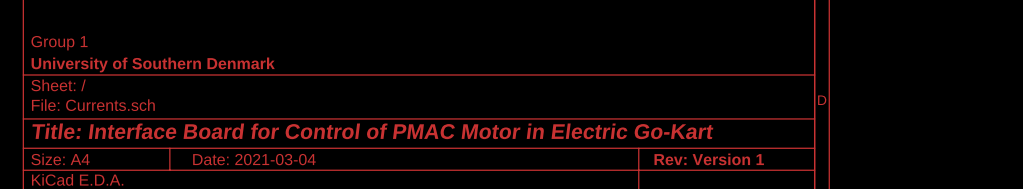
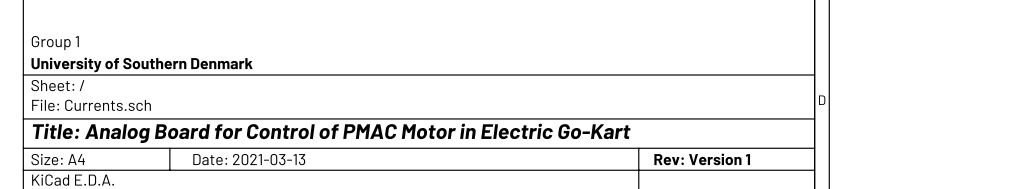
title block: Title: Interface Board for Control of PMAC Motor in Electric Go-Kart (372, 131) -> Title: Analog Board for Control of PMAC Motor in Electric Go-Kart (331, 133)
title block: Date: 2021-03-04 (254, 159) -> Date: 2021-03-13 (249, 159)

